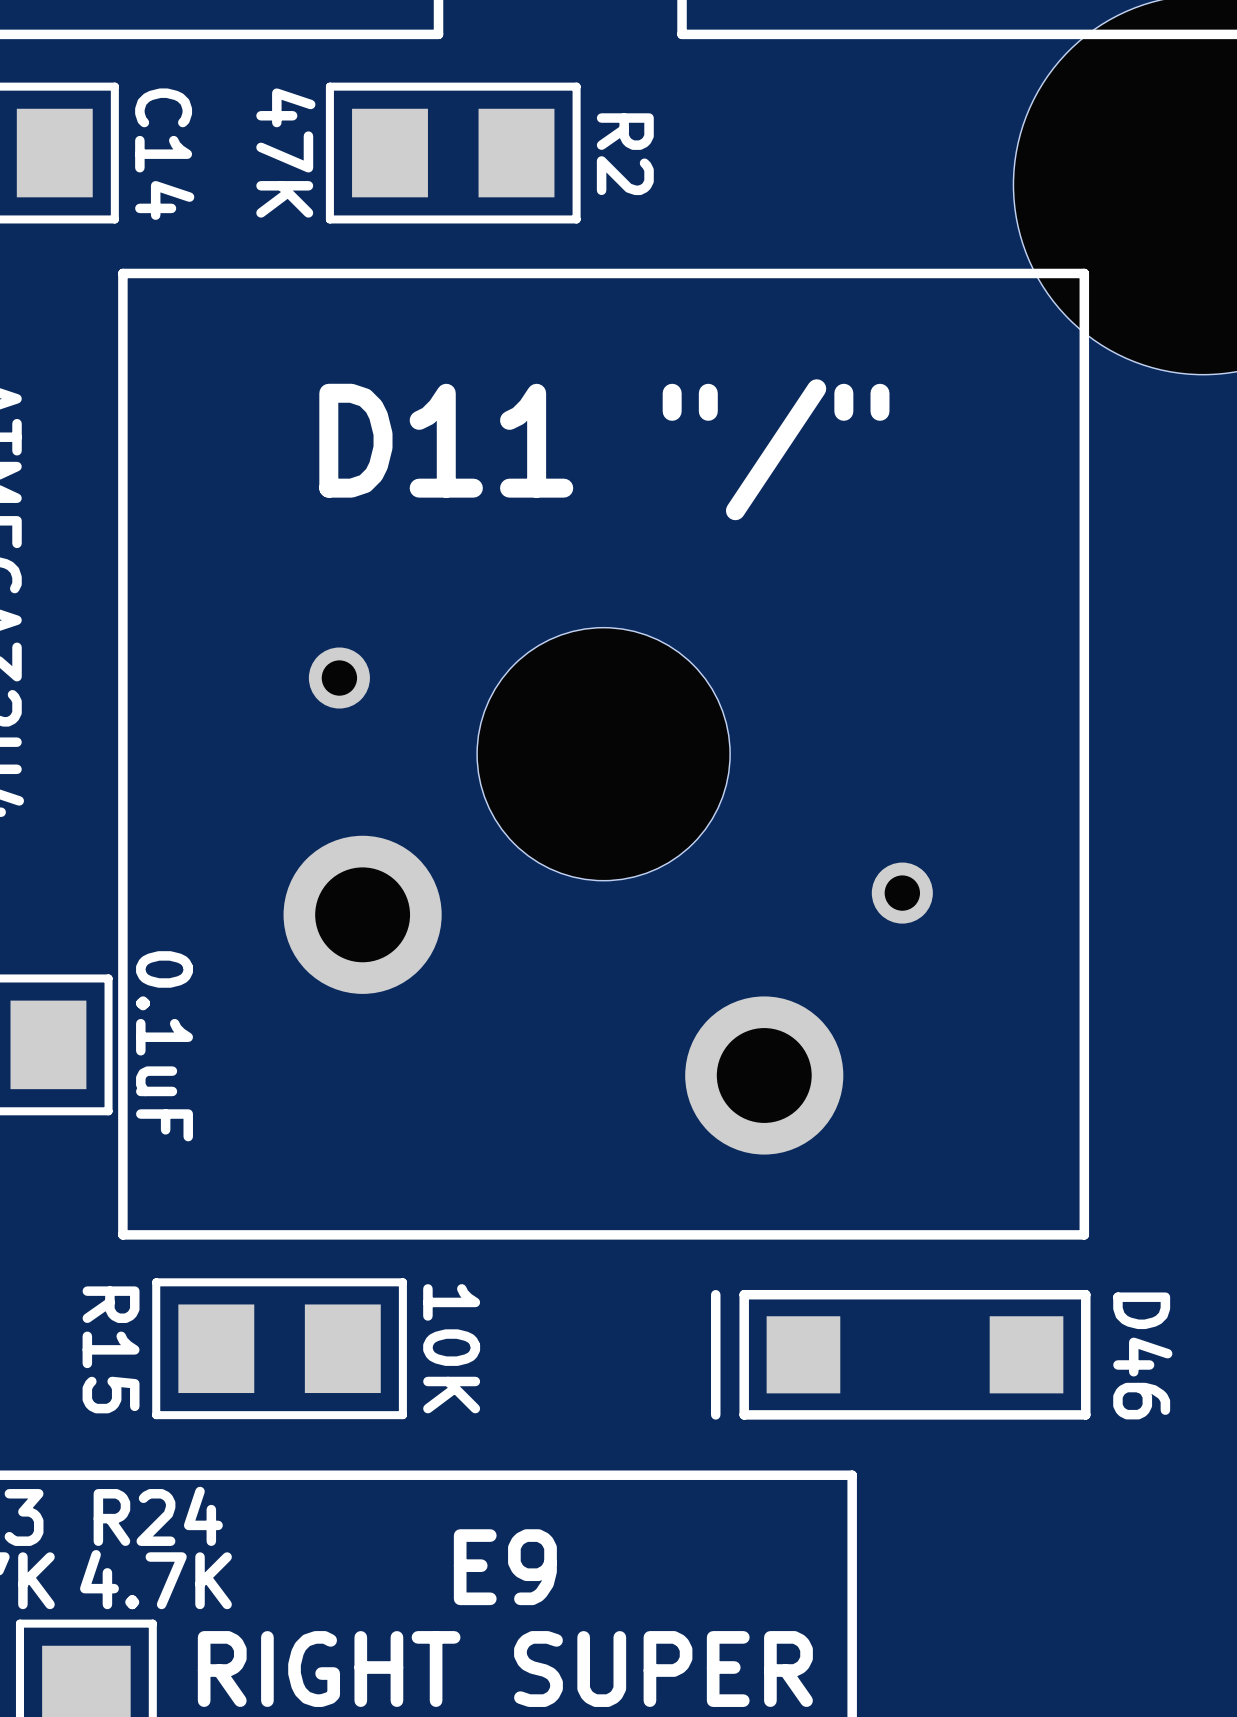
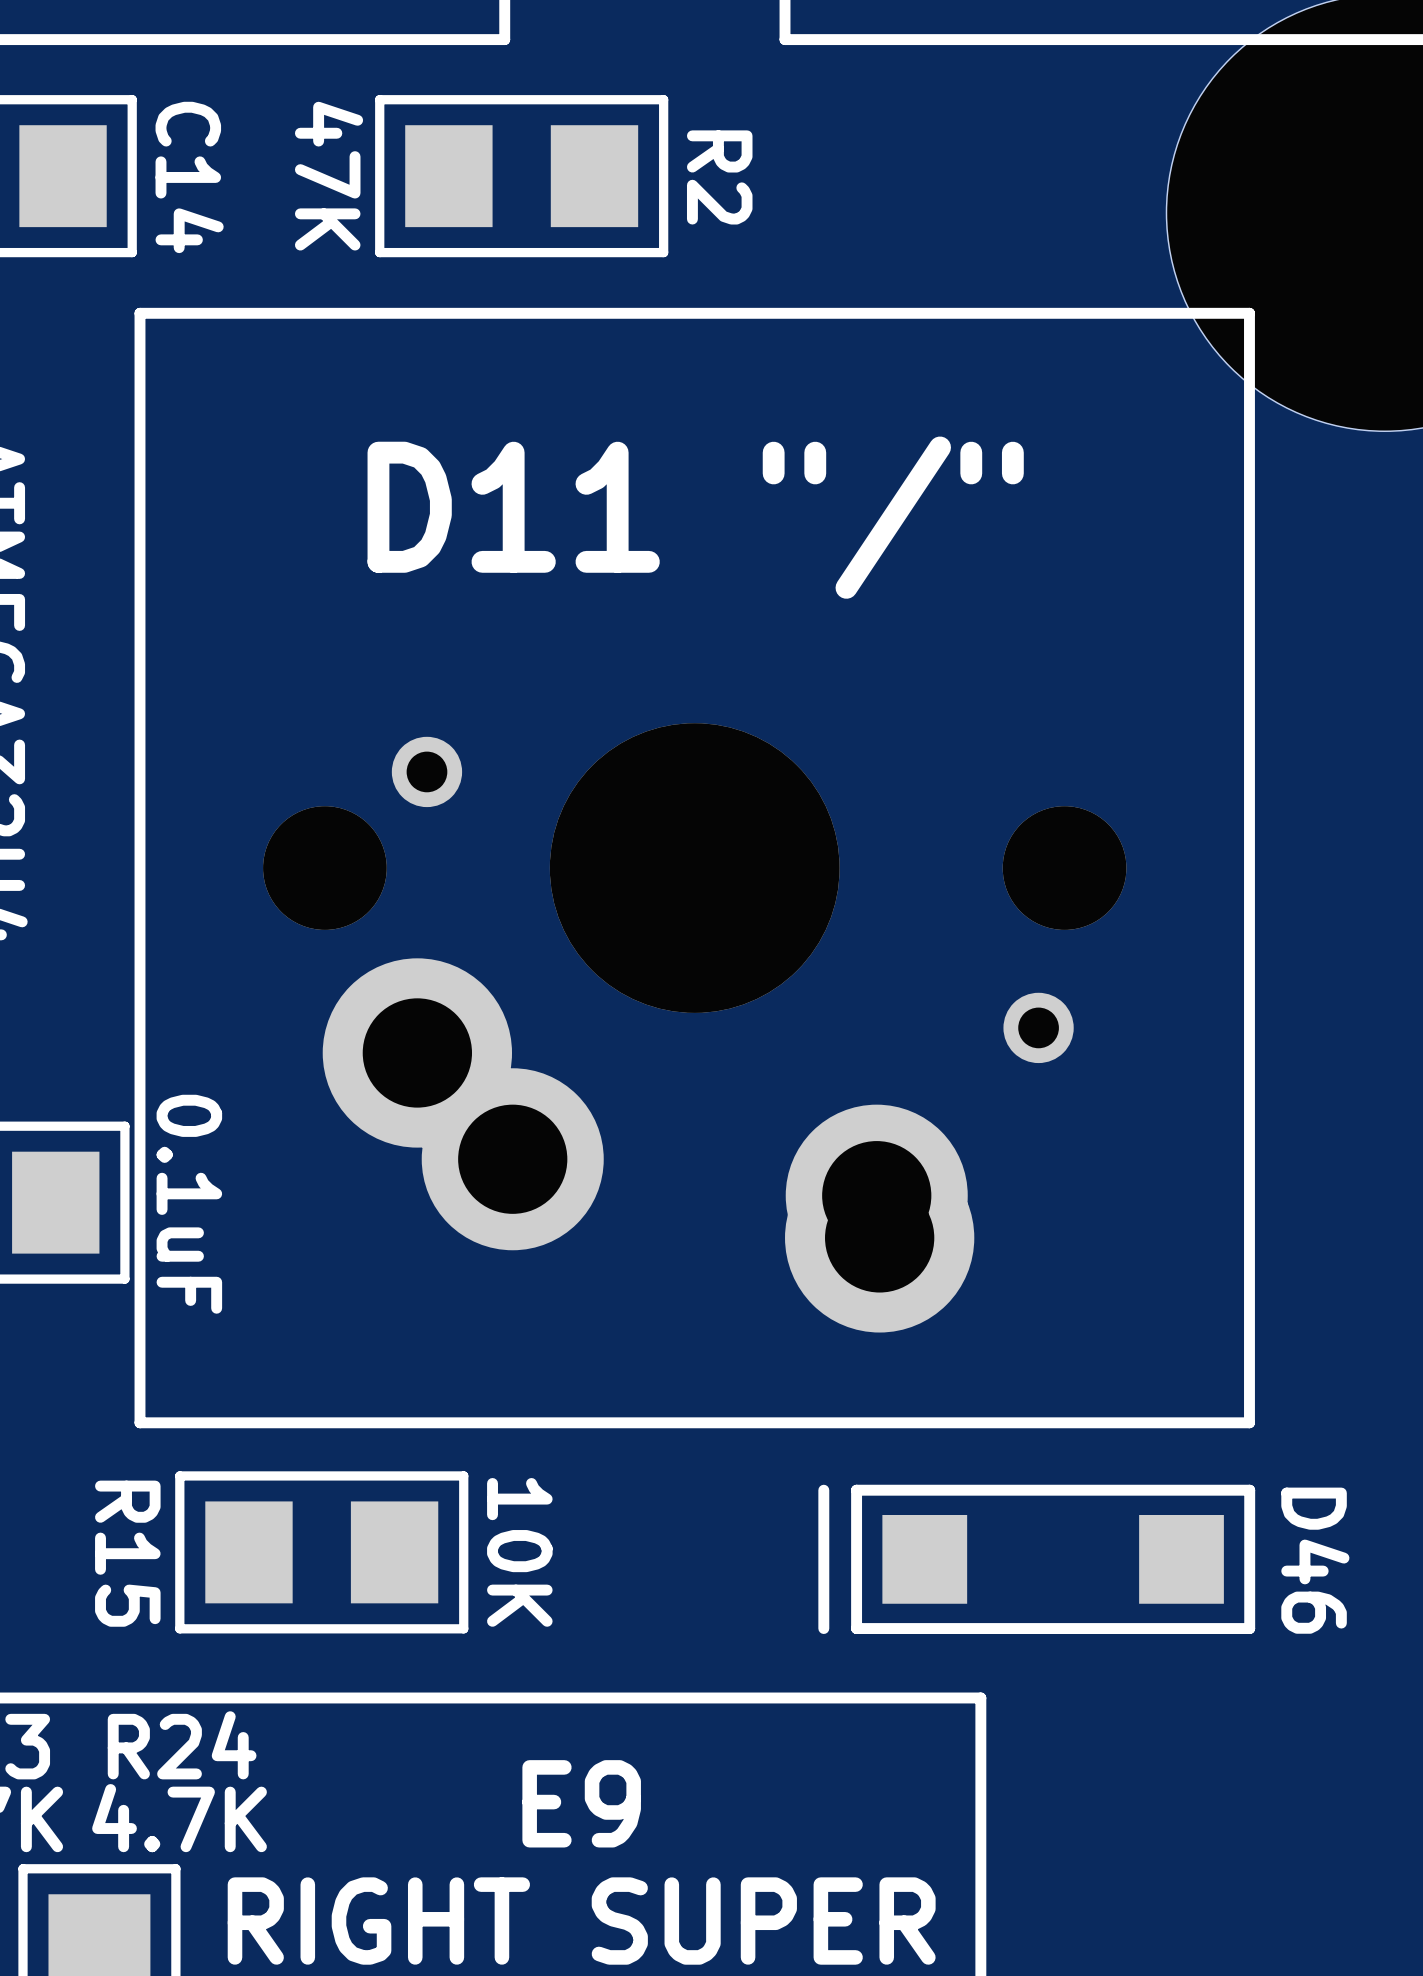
part footprint: [118, 268, 1090, 1240] -> [134, 307, 1255, 1429]
part position: (339, 678) -> (426, 771)

